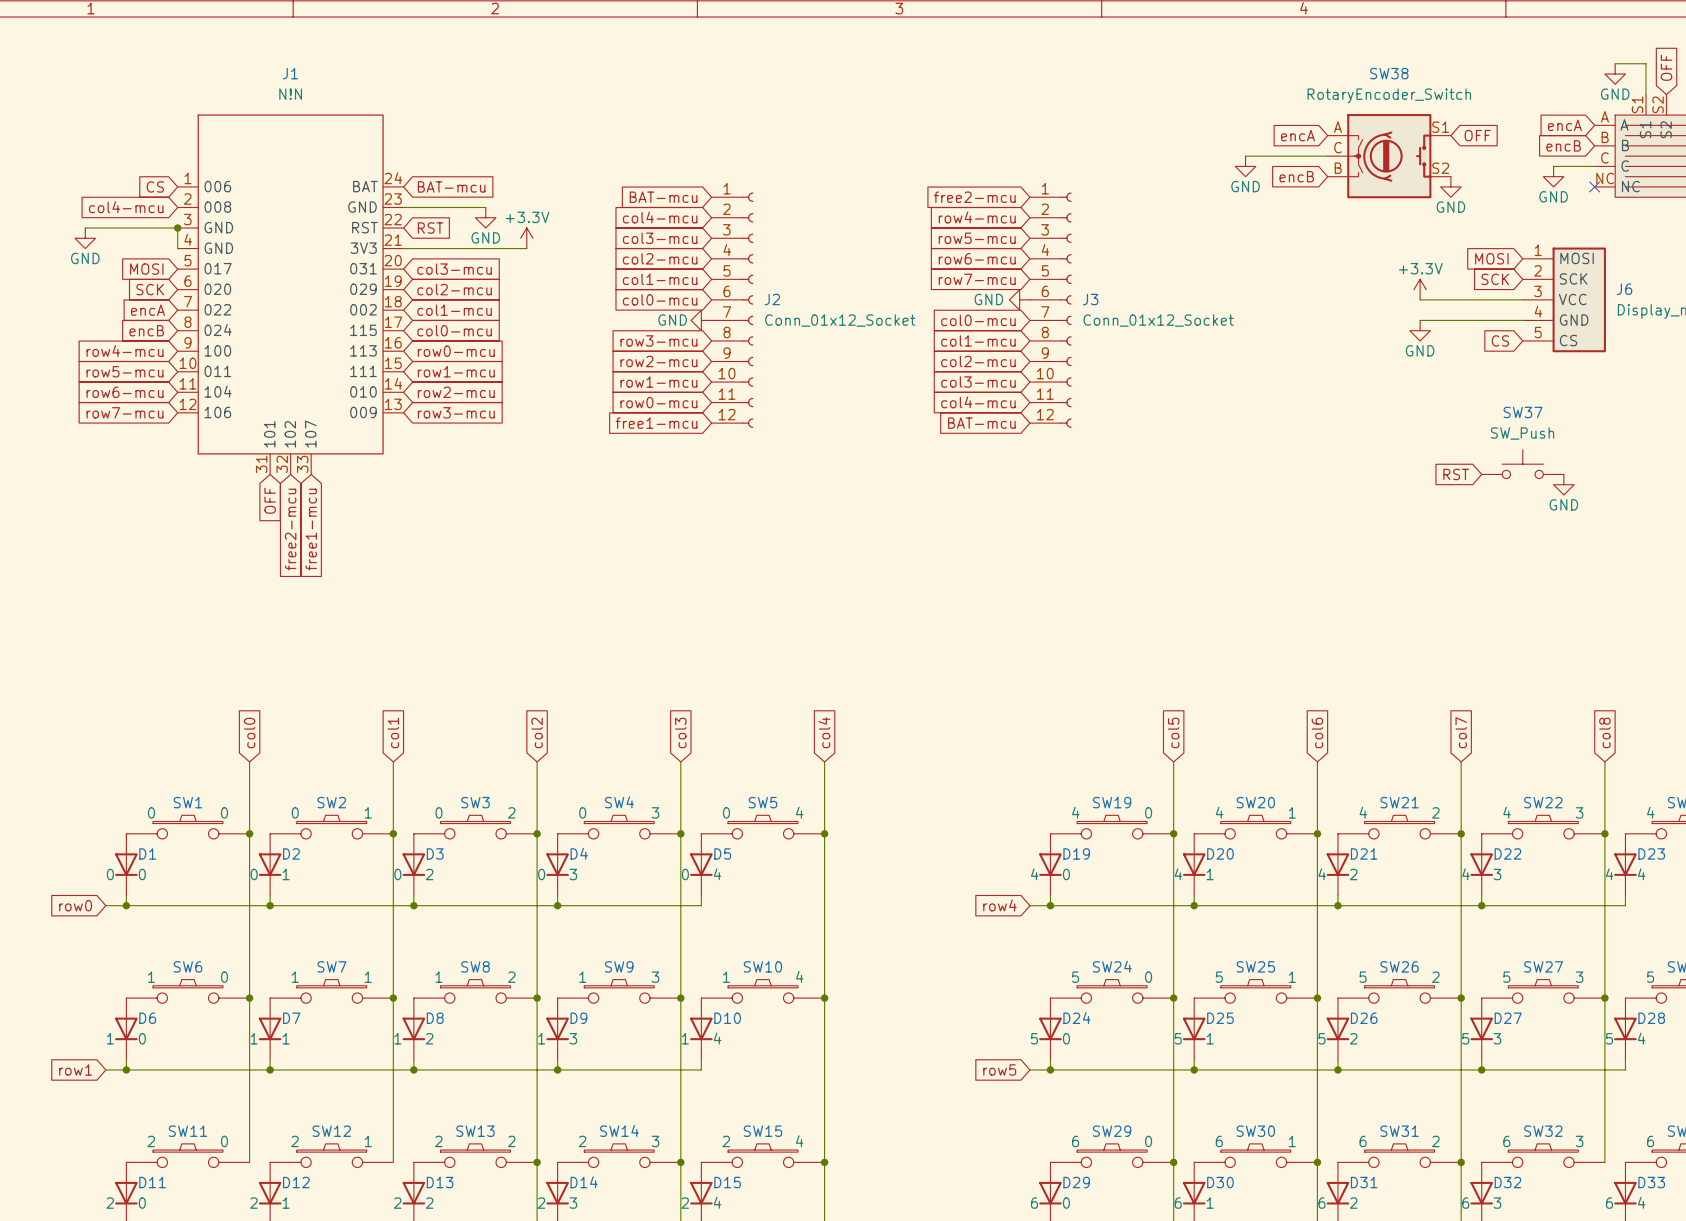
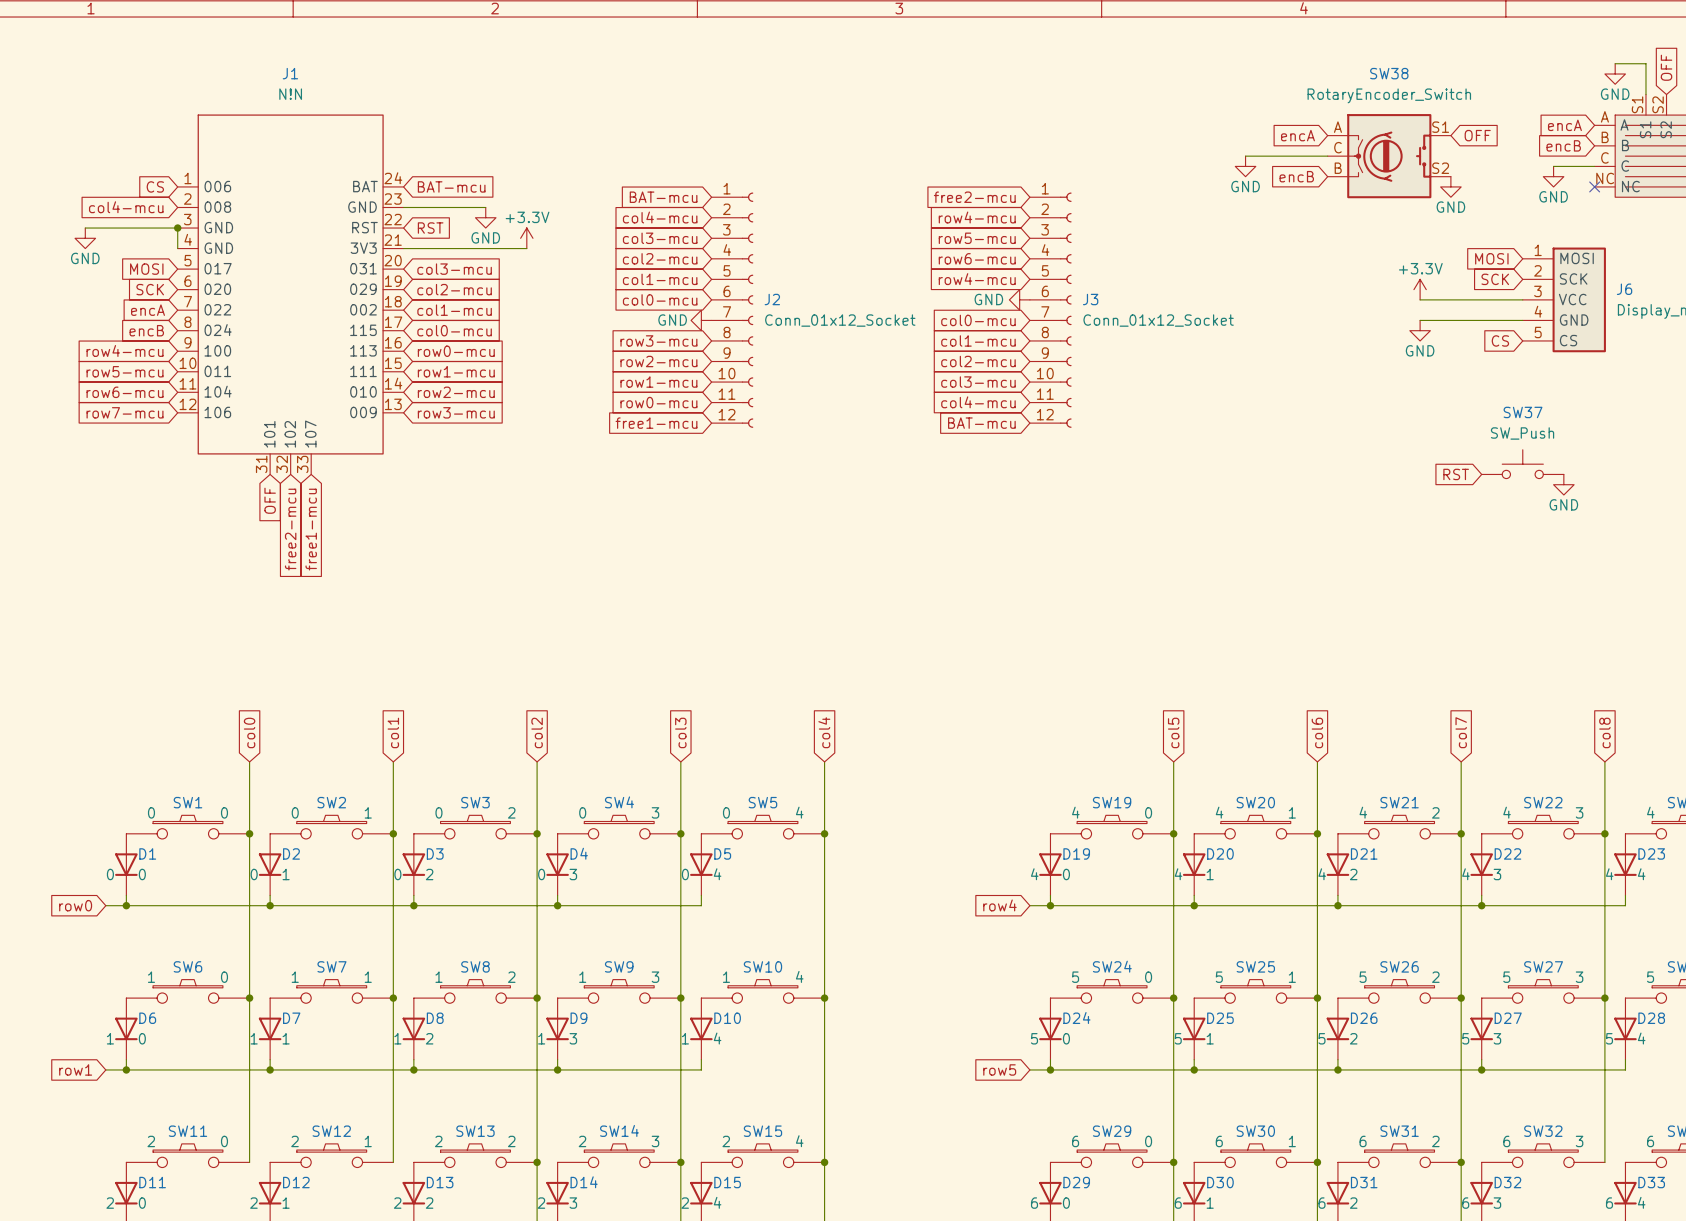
global label: row7-mcu (977, 279) -> row4-mcu (977, 279)

